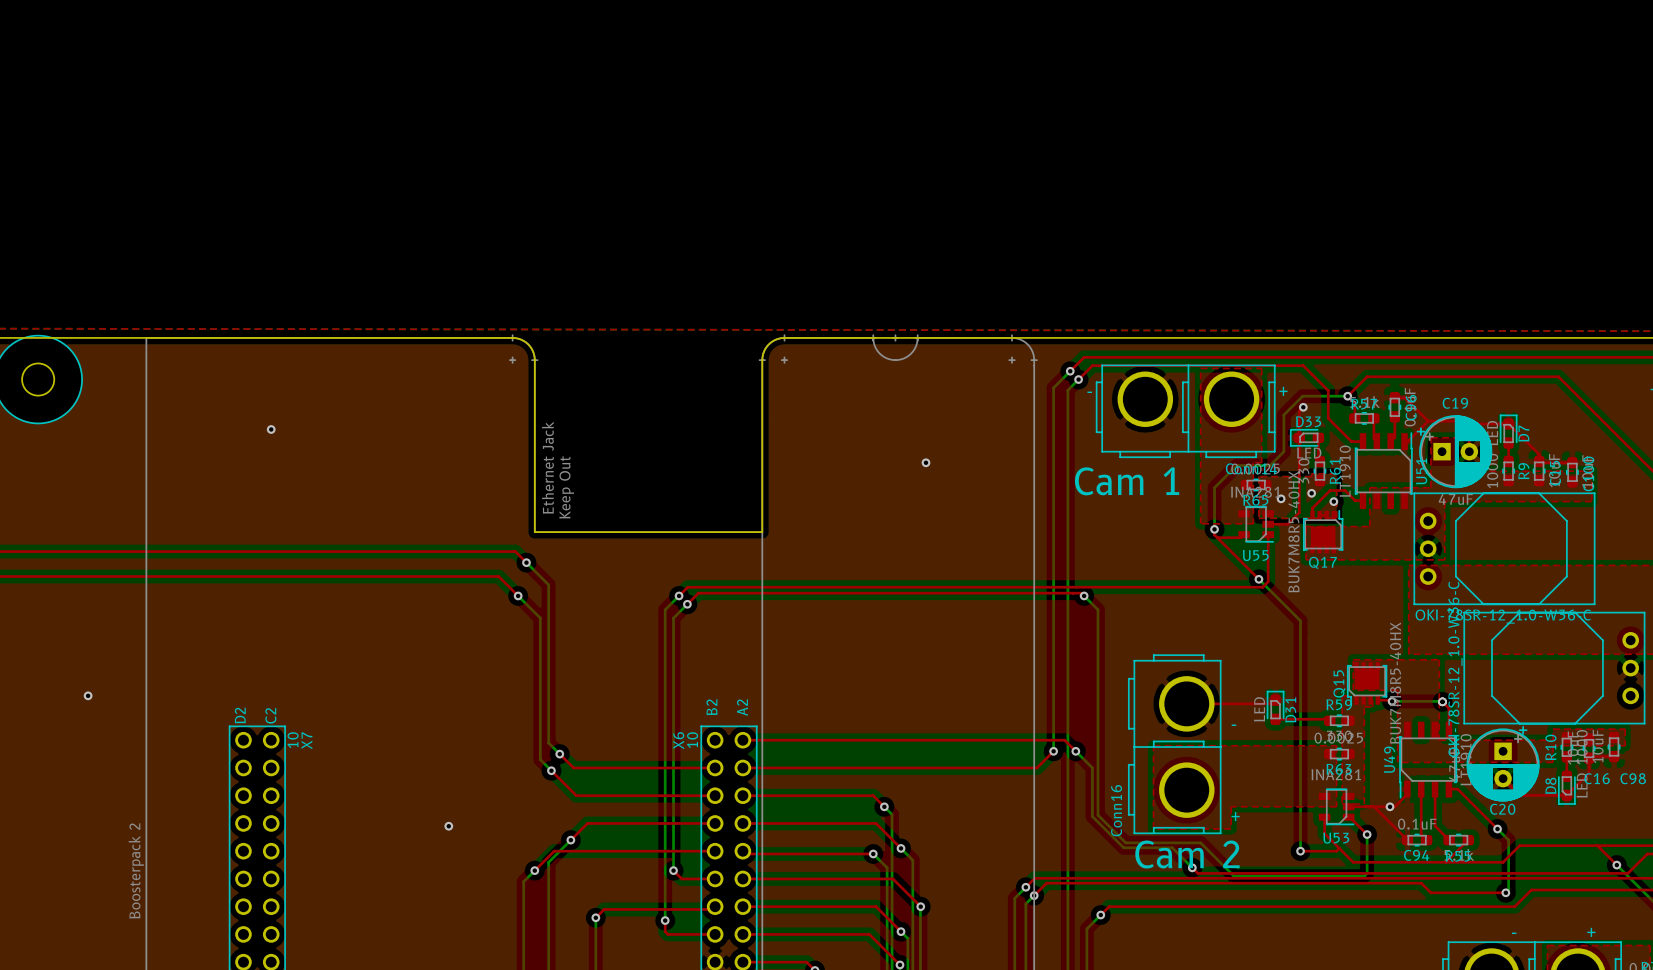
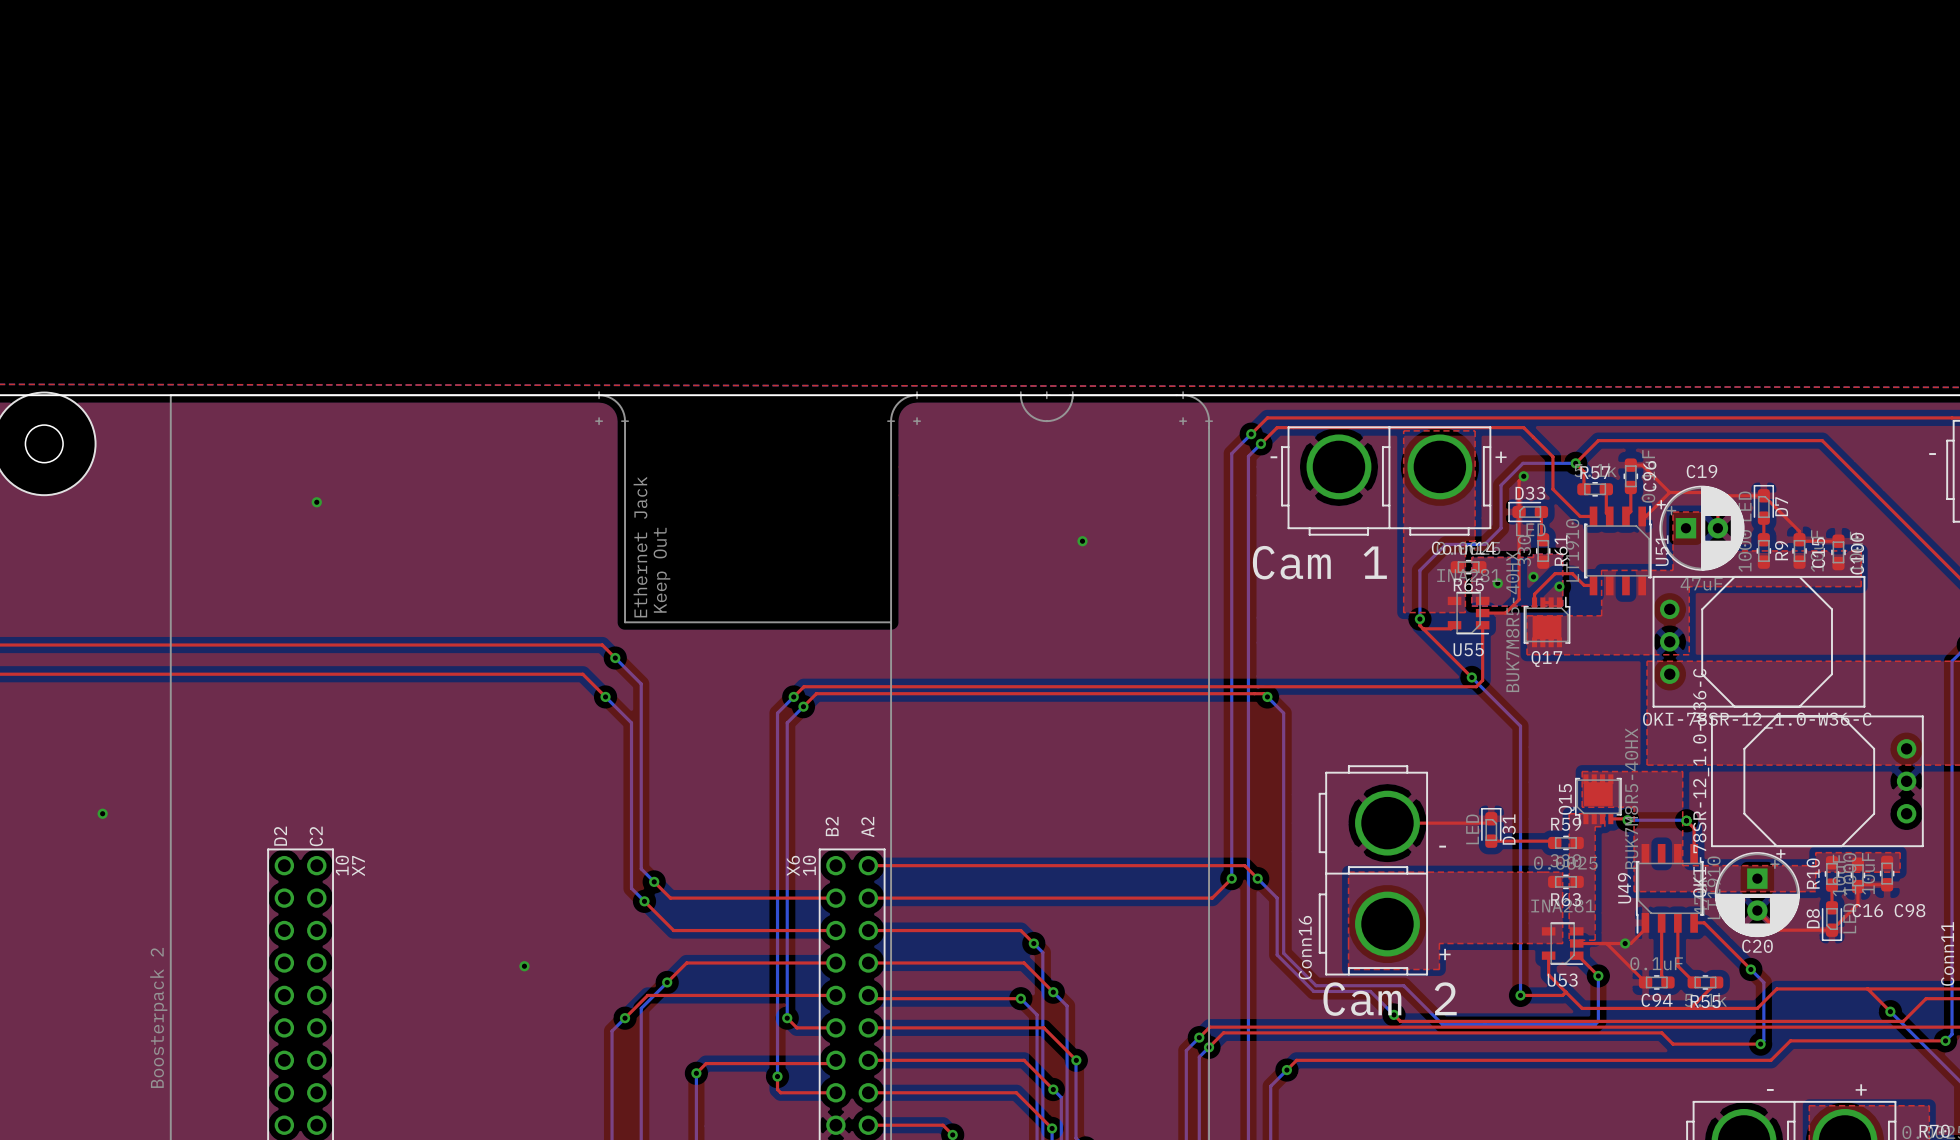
board edge: (512, 337) (521, 339) (528, 344) (534, 357) (534, 532) (762, 532) (762, 357) (768, 344) (776, 339) (784, 337) -> (599, 395) (917, 395)

